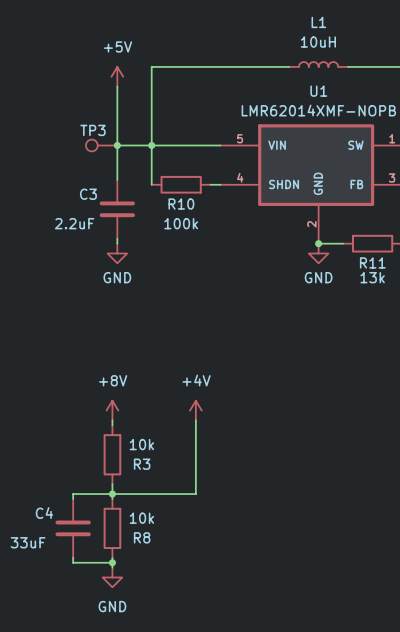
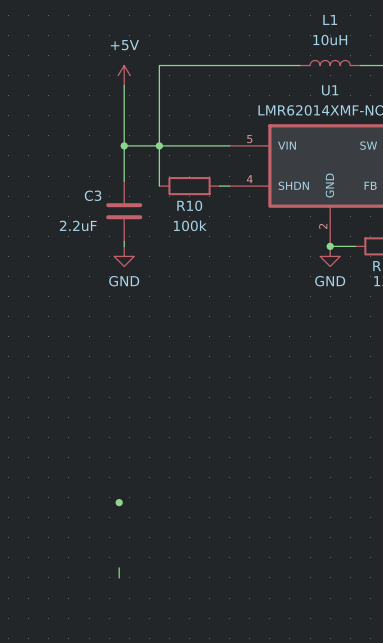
TP3: (101, 145) -> none
power symbol: +8V (112, 410) -> none
power symbol: +4V (195, 410) -> none
wire: (112, 420) (112, 425) -> none
wire: (195, 420) (195, 494) (73, 494) (73, 498) -> none
R3: 10k (112, 454) -> none
wire: (112, 484) (112, 498) -> none
C4: 33uF (73, 528) -> none
R8: 10k (112, 528) -> none
wire: (73, 557) (73, 562) (112, 562) -> none
junction: (112, 562) -> none
power symbol: GND (112, 577) -> none

